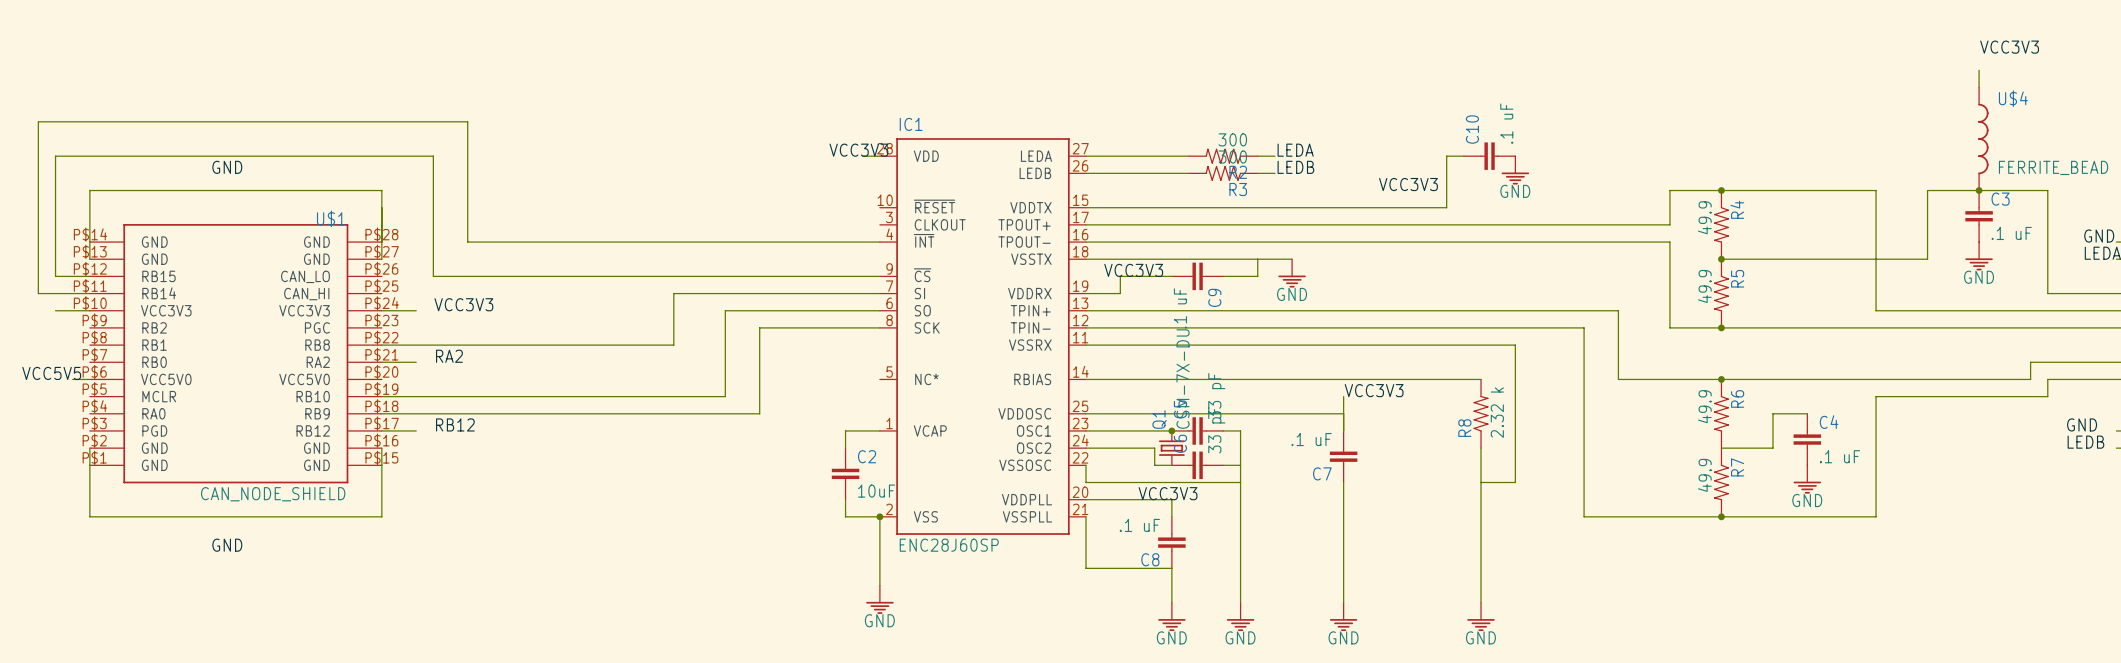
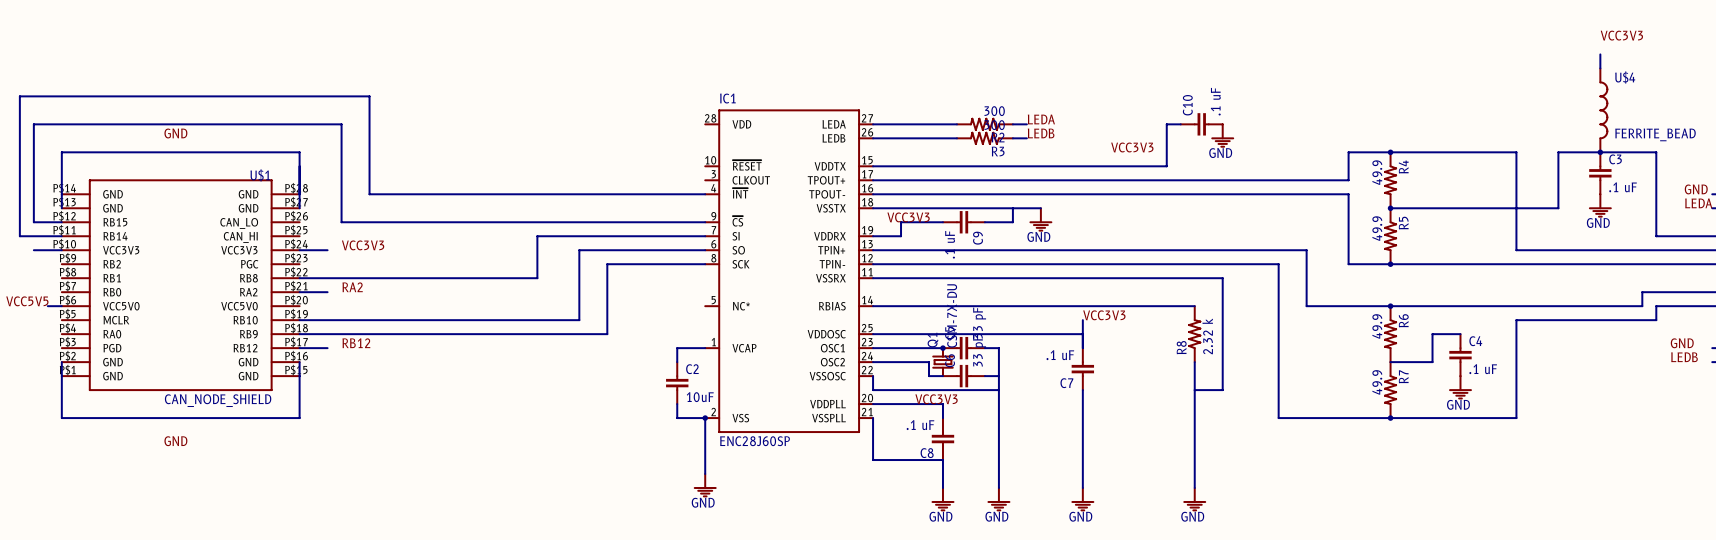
label: VCC3V3 (858, 150) -> none
wire: (862, 156) (879, 156) -> none

